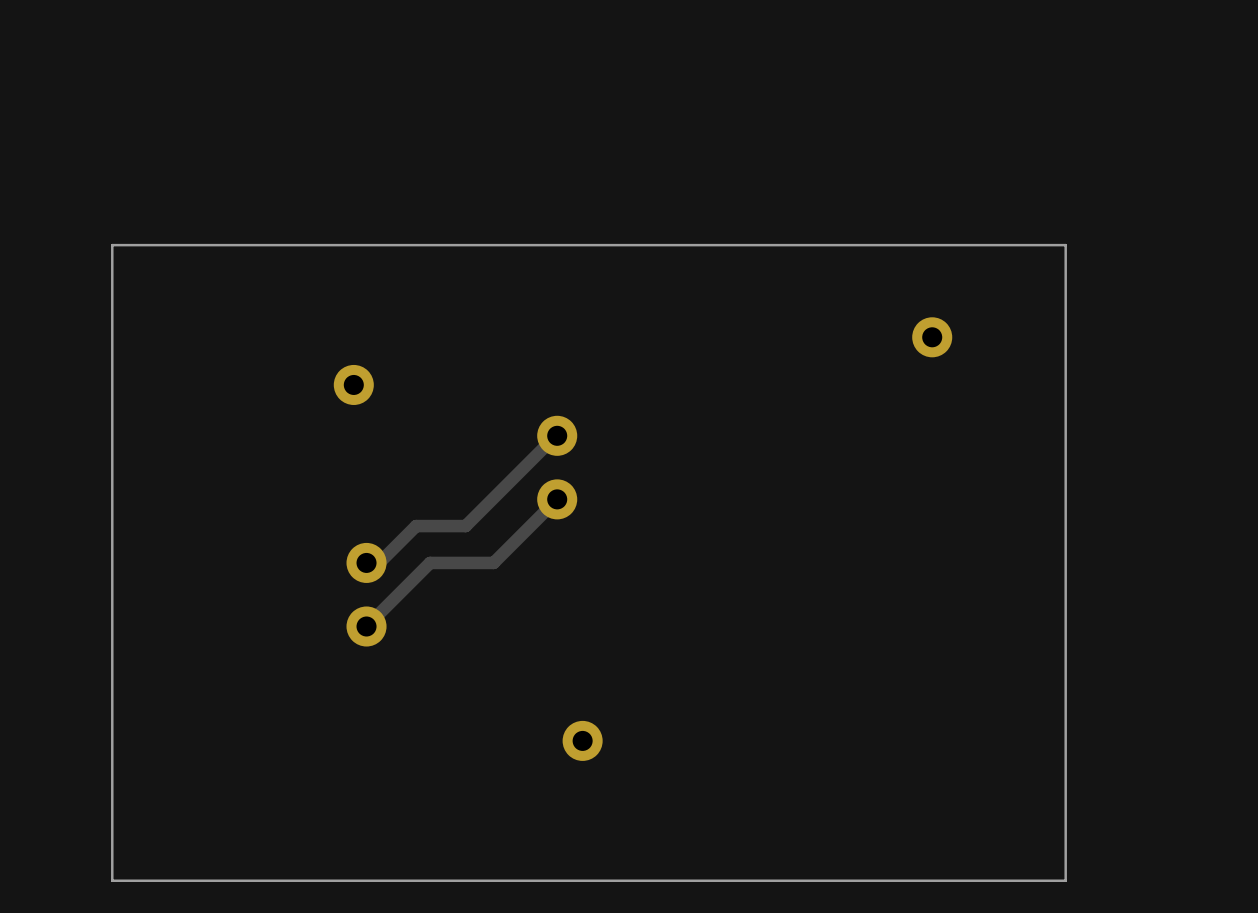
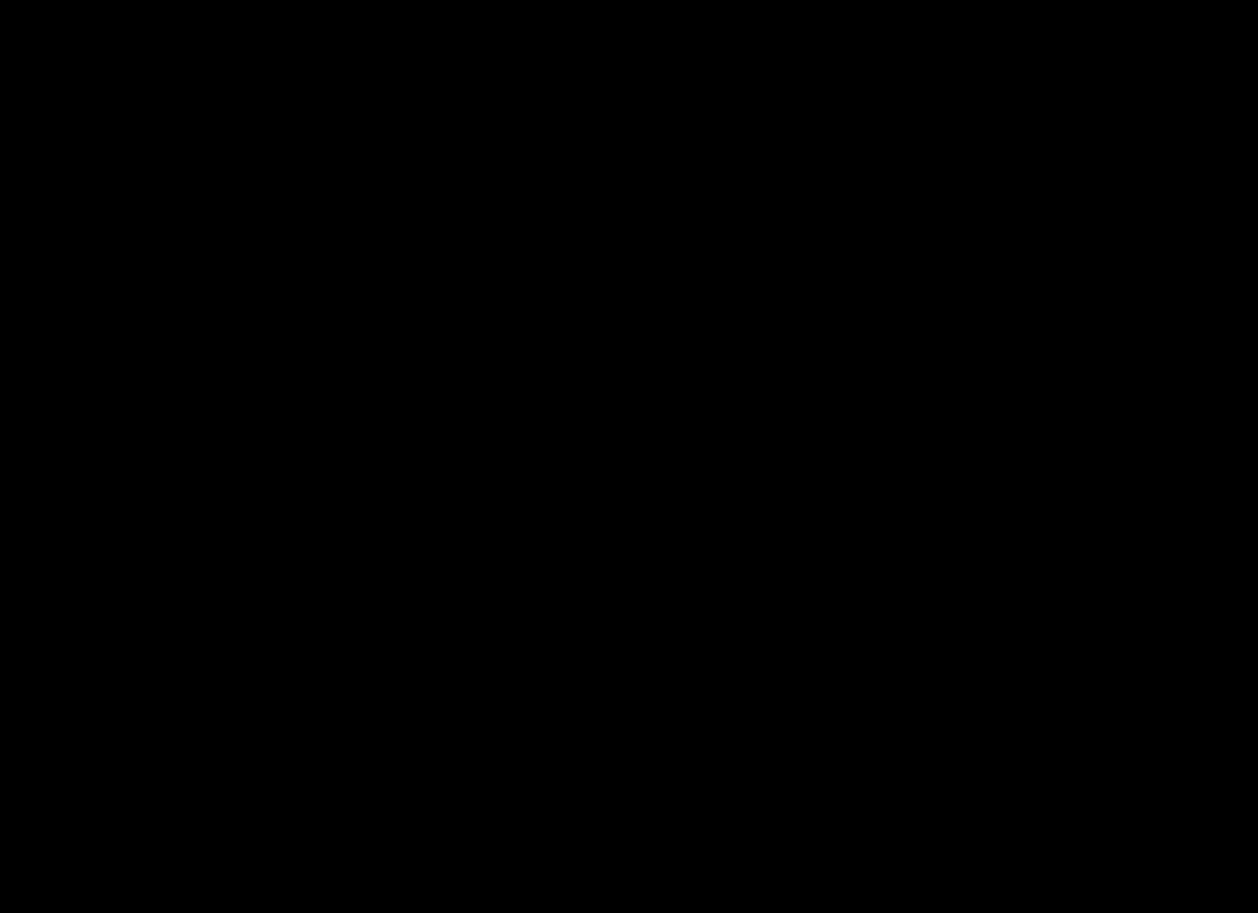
board edge: (1065, 245) (1065, 880) (112, 880) (112, 245) (1065, 245) -> none
via: (932, 337) -> none
via: (353, 384) -> none
via: (557, 435) -> none
track: (544, 447) (465, 526) (416, 526) (379, 562) (366, 562) -> none
track: (557, 499) (493, 562) (430, 562) (366, 626) -> none
via: (557, 499) -> none
via: (366, 562) -> none
via: (366, 626) -> none
via: (582, 740) -> none

